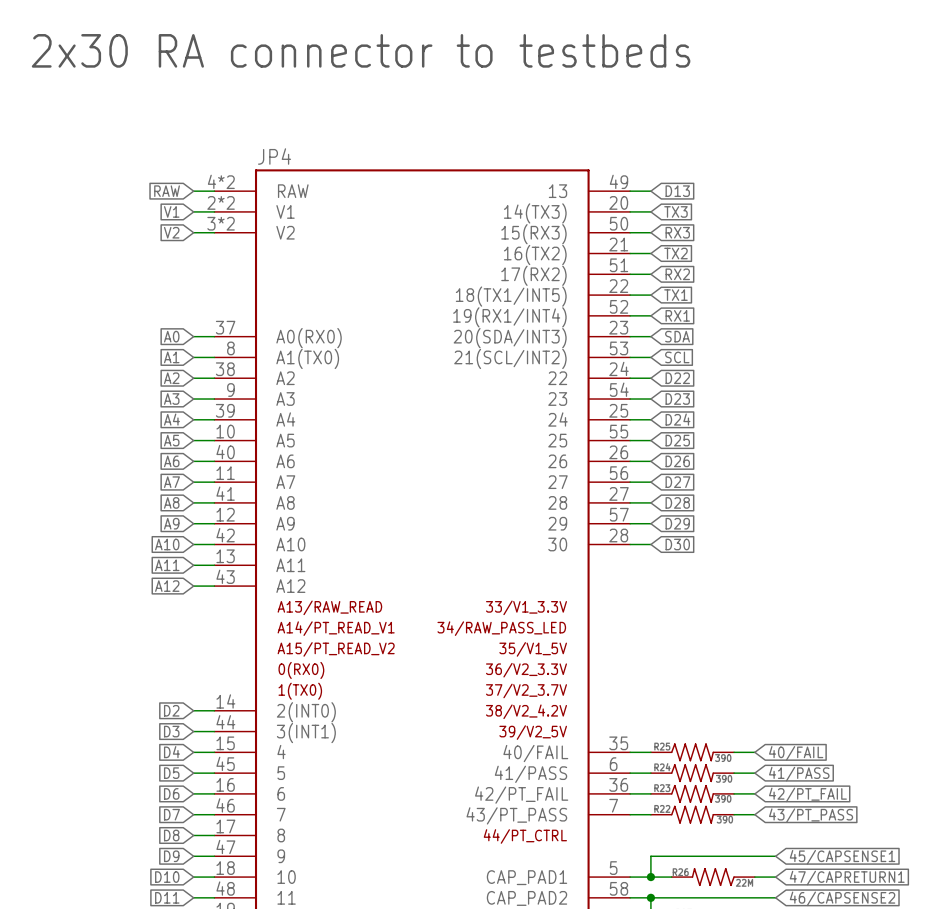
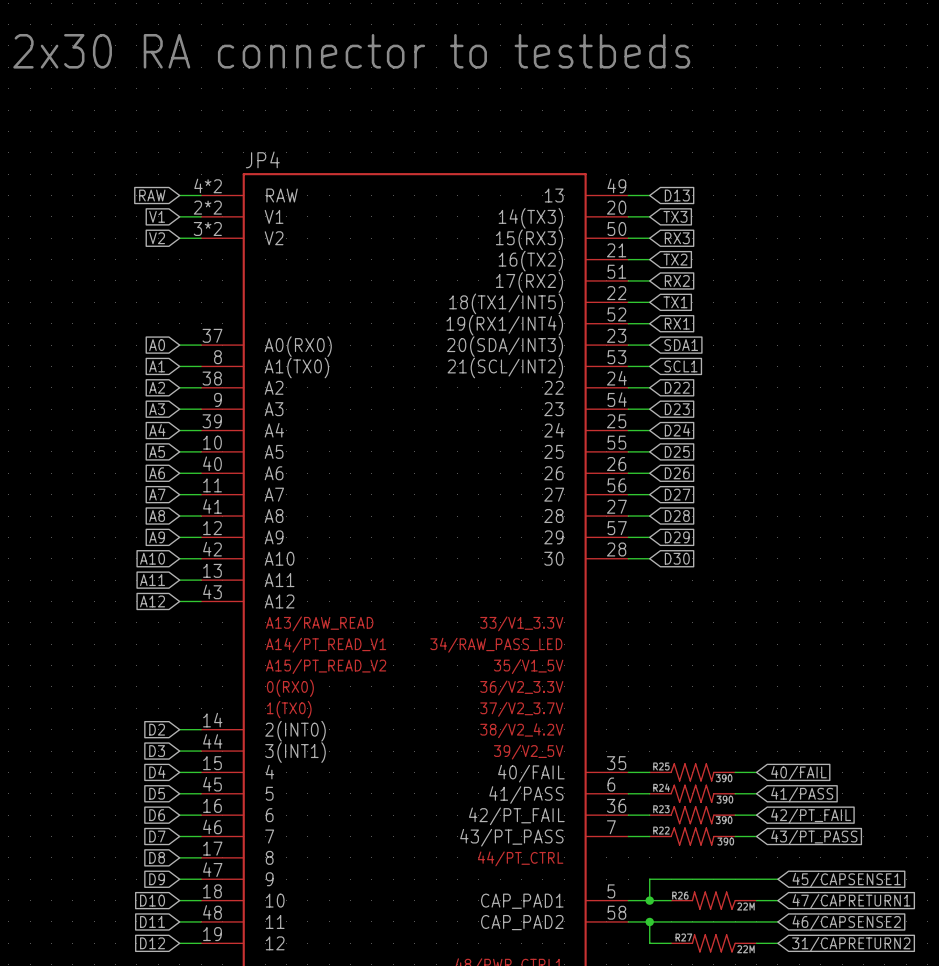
global label: SDA (677, 336) -> SDA1 (681, 345)
global label: SCL (677, 357) -> SCL1 (680, 366)

